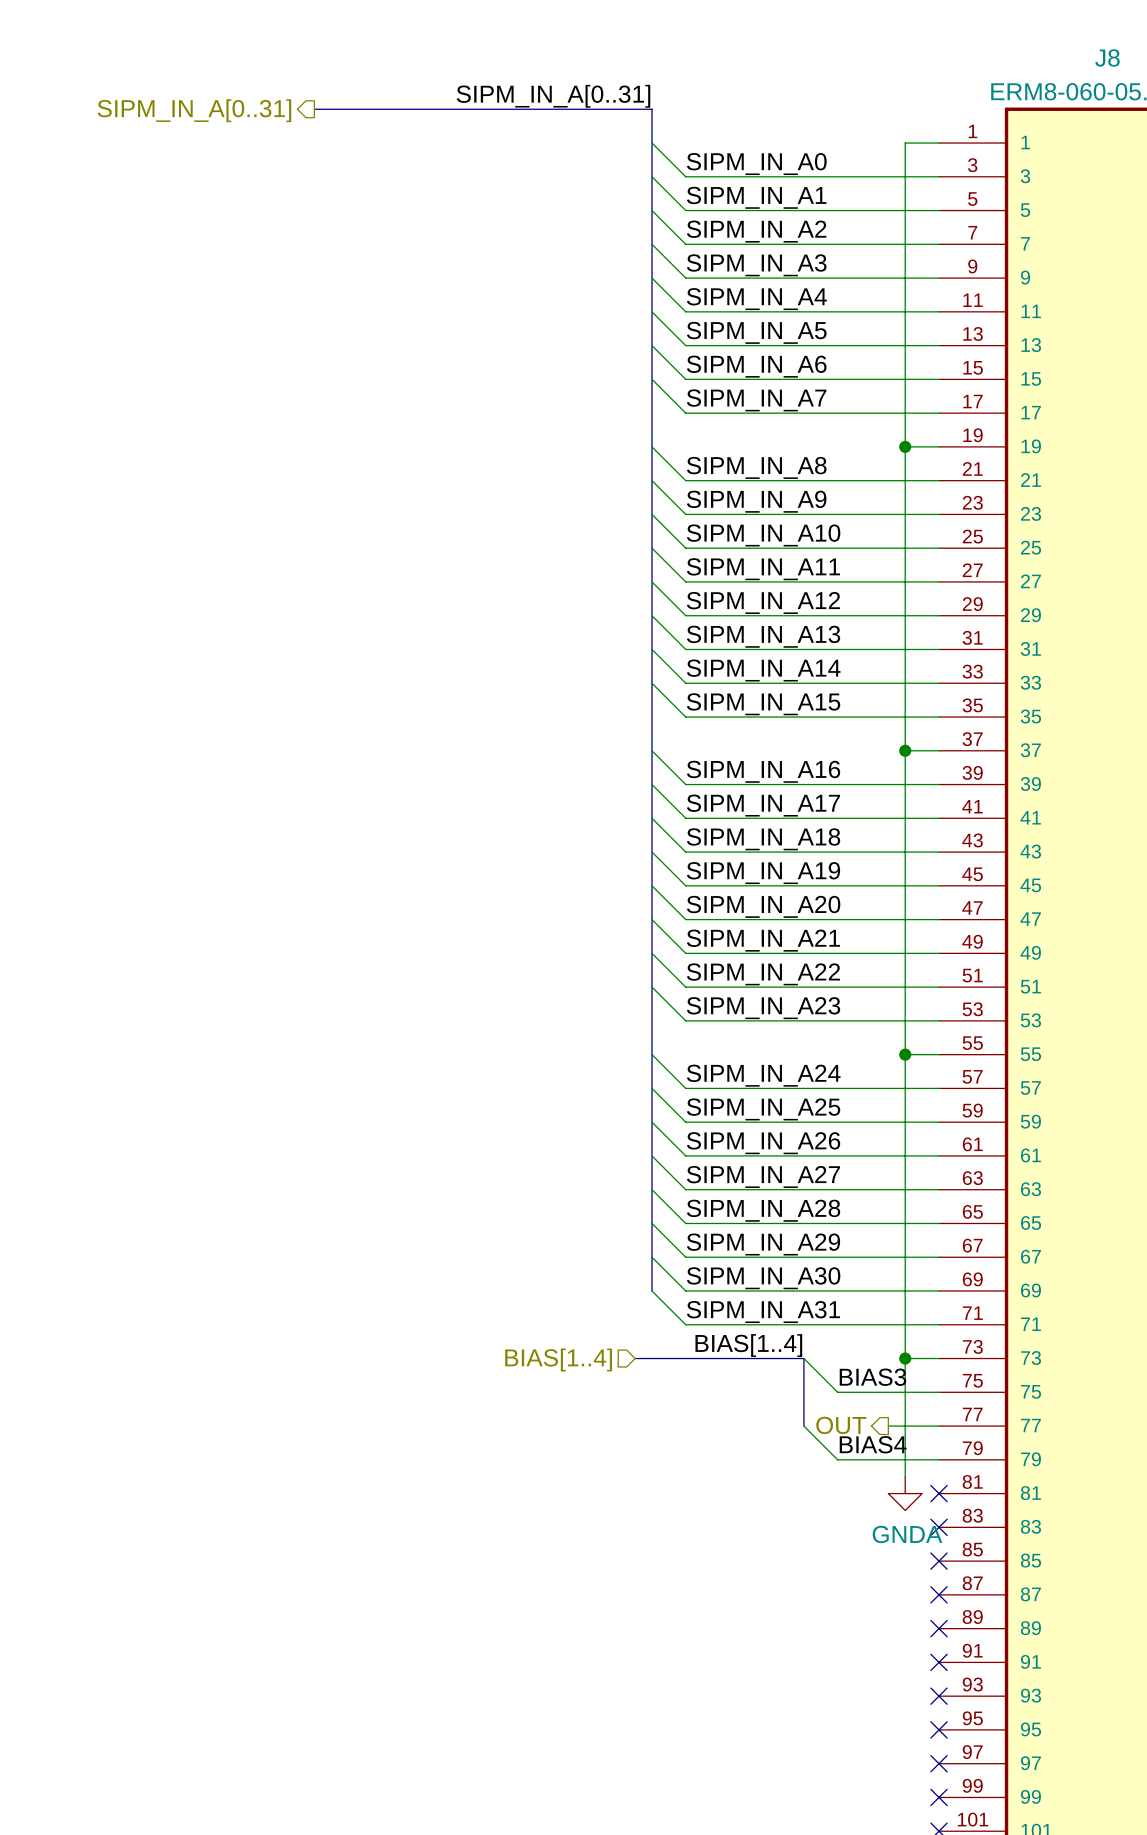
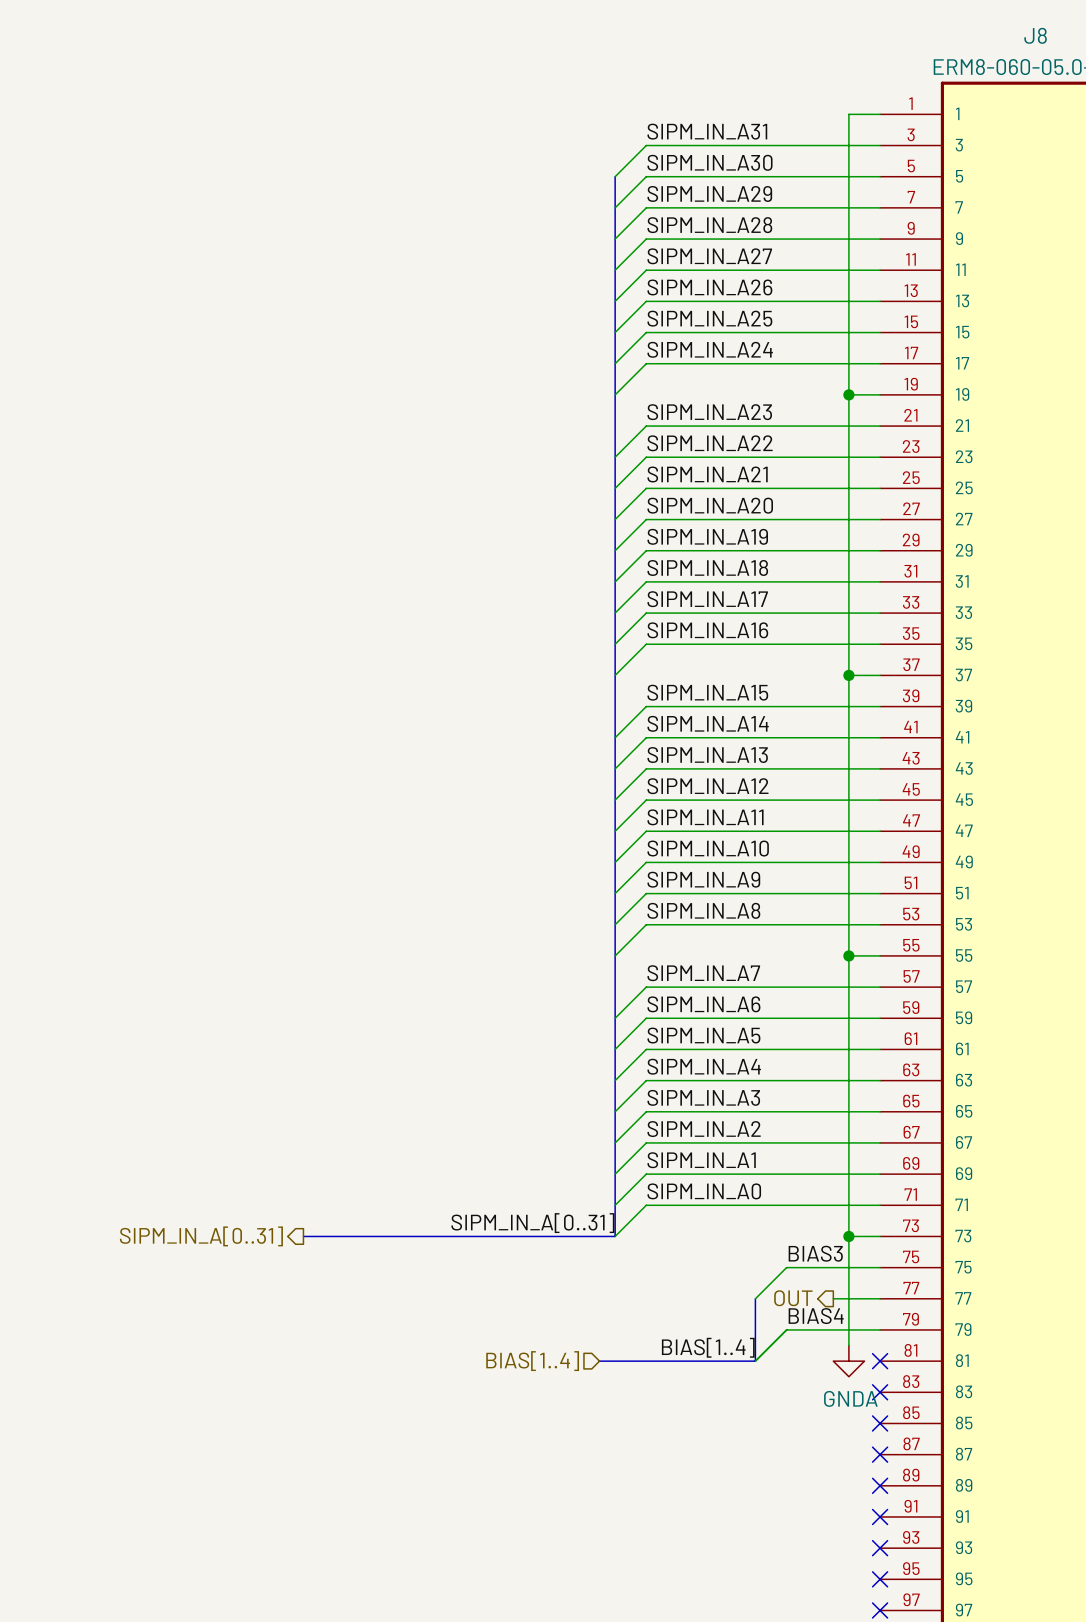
label: SIPM_IN_A[0..31] (553, 96) -> none
bus: (314, 109) (652, 109) (652, 210) -> none
hierarchical label: SIPM_IN_A[0..31] (194, 110) -> none
wire: (652, 143) (685, 176) -> (615, 176) (646, 145)
label: SIPM_IN_A0 (756, 164) -> SIPM_IN_A31 (707, 131)
wire: (652, 176) (685, 210) -> (615, 207) (646, 176)
label: SIPM_IN_A1 (756, 197) -> SIPM_IN_A30 (709, 162)
wire: (652, 210) (685, 244) -> none
label: SIPM_IN_A2 (756, 231) -> SIPM_IN_A29 (709, 193)
wire: (652, 244) (685, 278) -> (615, 270) (646, 239)
label: SIPM_IN_A3 (756, 265) -> SIPM_IN_A28 (709, 225)
wire: (652, 278) (685, 311) -> (615, 239) (646, 207)
label: SIPM_IN_A4 (756, 299) -> SIPM_IN_A27 (709, 256)
wire: (652, 311) (685, 345) -> (615, 332) (646, 301)
label: SIPM_IN_A5 (756, 332) -> SIPM_IN_A26 (709, 287)
wire: (652, 345) (685, 379) -> (615, 301) (646, 270)
label: SIPM_IN_A6 (756, 366) -> SIPM_IN_A25 (709, 318)
wire: (652, 379) (685, 413) -> (615, 394) (646, 363)
wire: none -> (646, 332) (615, 363)
label: SIPM_IN_A7 (756, 400) -> SIPM_IN_A24 (710, 349)
wire: (652, 446) (685, 480) -> (615, 457) (646, 426)
label: SIPM_IN_A8 (756, 467) -> SIPM_IN_A23 (709, 412)
wire: (652, 480) (685, 514) -> none
label: SIPM_IN_A9 (756, 501) -> SIPM_IN_A22 (710, 443)
wire: (652, 514) (685, 548) -> (615, 519) (646, 488)
label: SIPM_IN_A10 (763, 535) -> SIPM_IN_A21 (707, 474)
wire: (652, 548) (685, 581) -> (615, 488) (646, 457)
label: SIPM_IN_A11 (763, 569) -> SIPM_IN_A20 (710, 505)
wire: (652, 581) (685, 615) -> (615, 581) (646, 550)
label: SIPM_IN_A12 (763, 602) -> SIPM_IN_A19 (707, 536)
wire: (652, 615) (685, 649) -> (615, 550) (646, 519)
label: SIPM_IN_A13 (763, 636) -> SIPM_IN_A18 (707, 567)
wire: (652, 649) (685, 683) -> (615, 644) (646, 613)
label: SIPM_IN_A14 (763, 670) -> SIPM_IN_A17 (707, 599)
wire: (652, 683) (685, 717) -> (615, 613) (646, 581)
label: SIPM_IN_A15 (763, 704) -> SIPM_IN_A16 (707, 630)
wire: (652, 750) (685, 784) -> (615, 675) (646, 644)
label: SIPM_IN_A16 (763, 771) -> SIPM_IN_A15 (707, 692)
wire: (652, 784) (685, 818) -> (615, 768) (646, 737)
label: SIPM_IN_A17 (763, 805) -> SIPM_IN_A14 (708, 723)
wire: (652, 818) (685, 852) -> (615, 737) (646, 706)
label: SIPM_IN_A18 (763, 839) -> SIPM_IN_A13 (707, 755)
wire: (652, 852) (685, 885) -> (615, 831) (646, 800)
label: SIPM_IN_A19 (763, 873) -> SIPM_IN_A12 (707, 786)
wire: (652, 885) (685, 919) -> (615, 800) (646, 768)
label: SIPM_IN_A20 (763, 906) -> SIPM_IN_A11 (705, 817)
wire: (652, 919) (685, 953) -> none
wire: none -> (646, 831) (615, 862)
label: SIPM_IN_A21 (763, 940) -> SIPM_IN_A10 (708, 848)
wire: (652, 953) (685, 987) -> (615, 924) (646, 893)
label: SIPM_IN_A22 (763, 974) -> SIPM_IN_A9 (703, 879)
wire: (652, 987) (685, 1020) -> (615, 893) (646, 862)
label: SIPM_IN_A23 (763, 1008) -> SIPM_IN_A8 (703, 910)
wire: (652, 1054) (685, 1088) -> (615, 955) (646, 924)
label: SIPM_IN_A24 (763, 1075) -> SIPM_IN_A7 (703, 973)
wire: (652, 1088) (685, 1122) -> (615, 1049) (646, 1018)
label: SIPM_IN_A25 (763, 1109) -> SIPM_IN_A6 (703, 1004)
wire: (652, 1122) (685, 1155) -> (615, 1018) (646, 987)
label: SIPM_IN_A26 (763, 1143) -> SIPM_IN_A5 (703, 1035)
wire: (652, 1155) (685, 1189) -> none
wire: none -> (646, 1049) (615, 1080)
label: SIPM_IN_A27 (763, 1176) -> SIPM_IN_A4 (704, 1066)
wire: (652, 1189) (685, 1223) -> (615, 1142) (646, 1111)
label: SIPM_IN_A28 (763, 1210) -> SIPM_IN_A3 (703, 1097)
wire: (652, 1223) (685, 1257) -> (615, 1111) (646, 1080)
label: SIPM_IN_A29 (763, 1244) -> SIPM_IN_A2 (704, 1129)
wire: (652, 1257) (685, 1291) -> (615, 1205) (646, 1174)
label: SIPM_IN_A30 (763, 1278) -> SIPM_IN_A1 (701, 1160)
wire: (652, 1291) (685, 1324) -> (615, 1174) (646, 1142)
bus: none -> (615, 1174) (615, 1236)
label: SIPM_IN_A31 (763, 1312) -> SIPM_IN_A0 (704, 1191)
wire: none -> (646, 1205) (615, 1236)
label: none -> SIPM_IN_A[0..31] (532, 1223)
label position: BIAS[1..4] (748, 1345) -> BIAS[1..4] (708, 1347)
bus: none -> (303, 1236) (599, 1236)
bus: (652, 1358) (803, 1358) (803, 1426) -> (599, 1361) (755, 1361) (755, 1298)
wire: (803, 1358) (837, 1392) -> (755, 1298) (786, 1267)
hierarchical label: none -> SIPM_IN_A[0..31] (201, 1236)
hierarchical label position: BIAS[1..4] (558, 1359) -> BIAS[1..4] (532, 1361)
wire: (803, 1426) (837, 1459) -> (755, 1361) (786, 1329)

